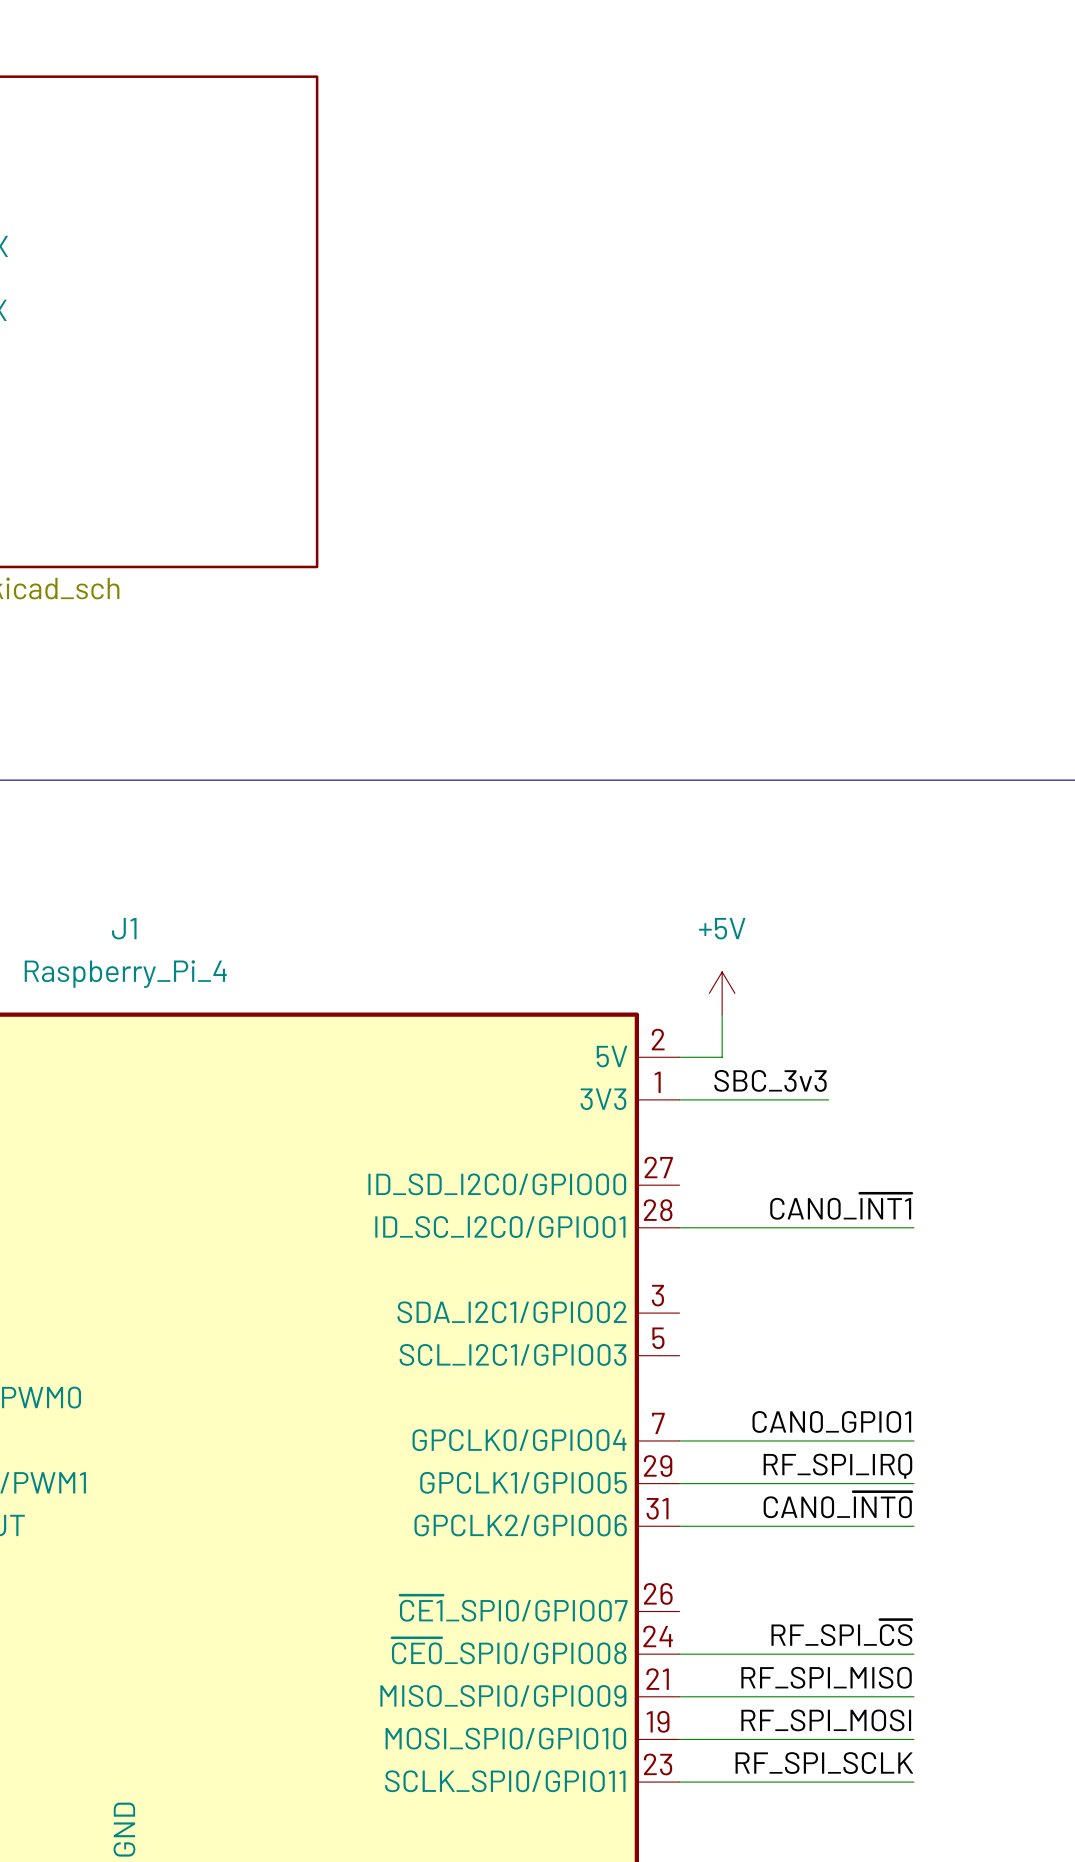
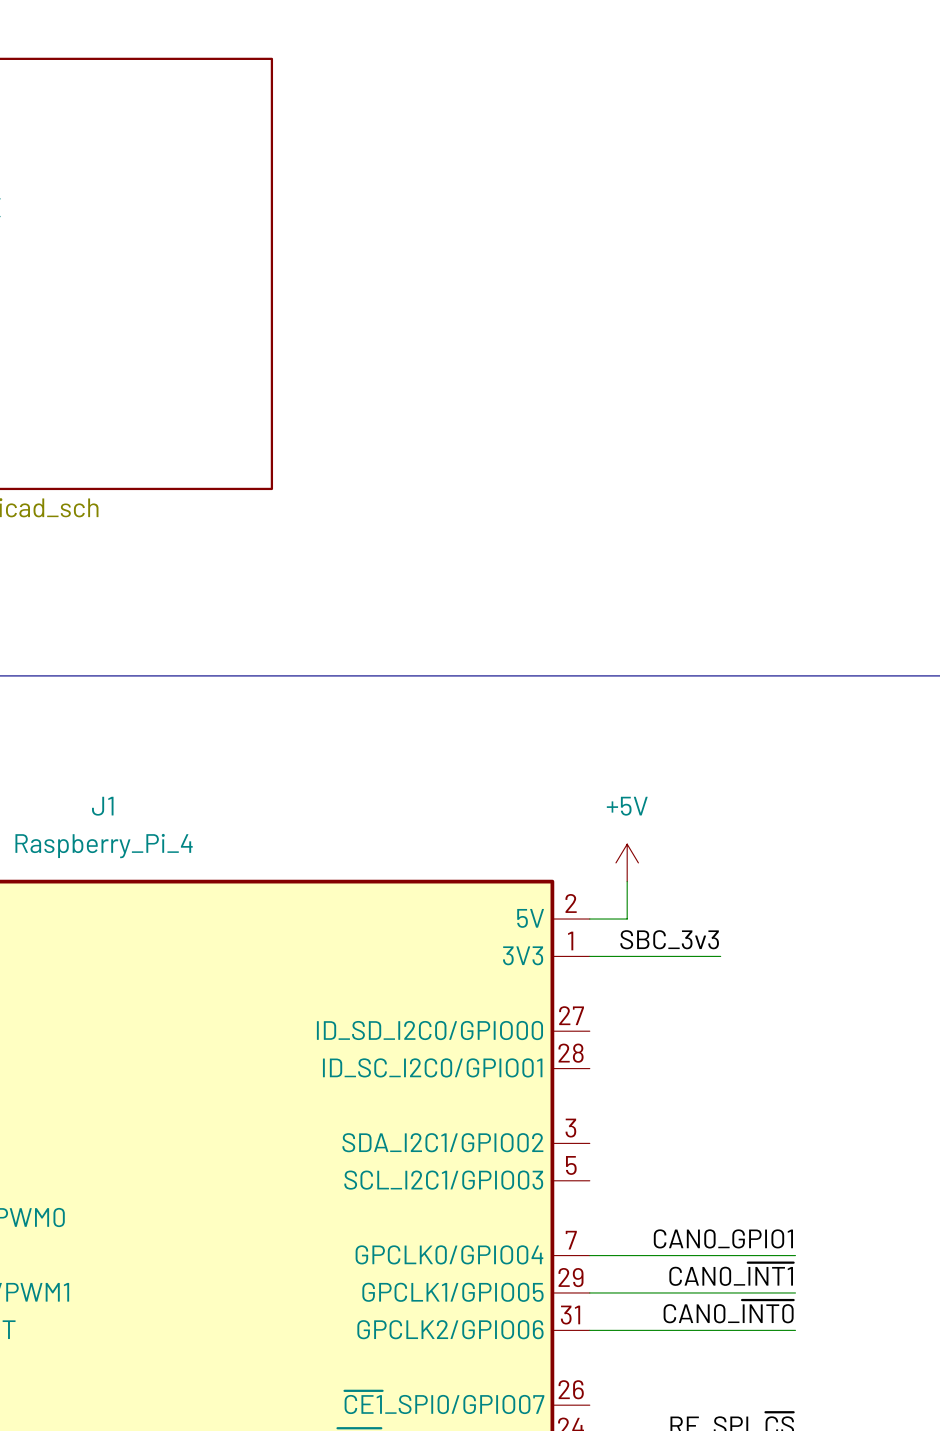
label: CAN0_~{INT1} (841, 1206) -> none
wire: (679, 1227) (913, 1227) -> none
label: RF_SPI_IRQ (837, 1466) -> CAN0_~{INT1} (731, 1274)

